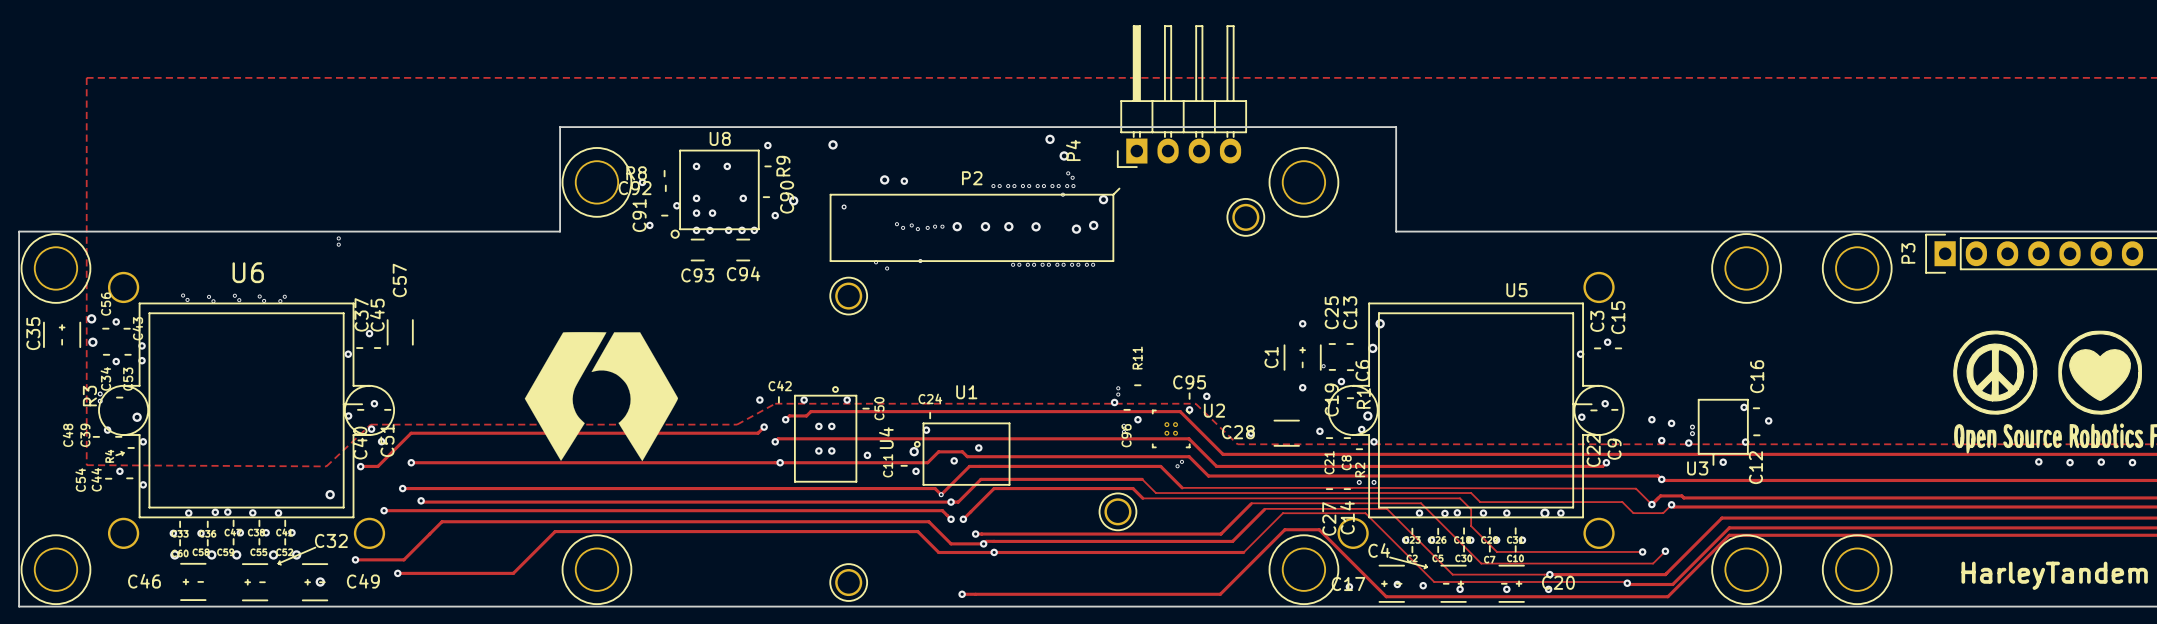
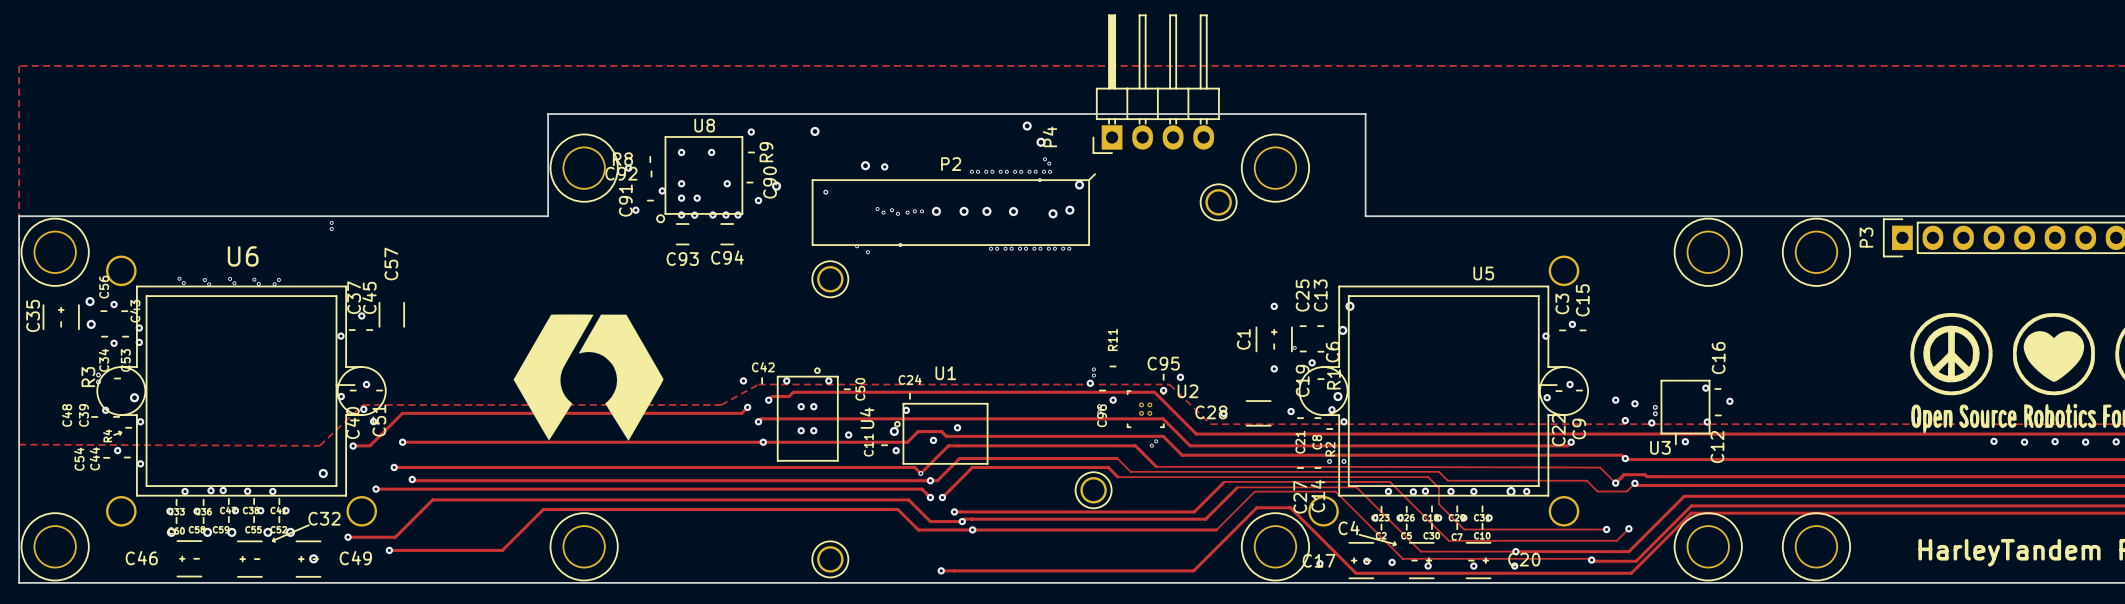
zone outline: (86, 77) (86, 465) (326, 466) -> (85, 65) (19, 65) (19, 444) (319, 445)

